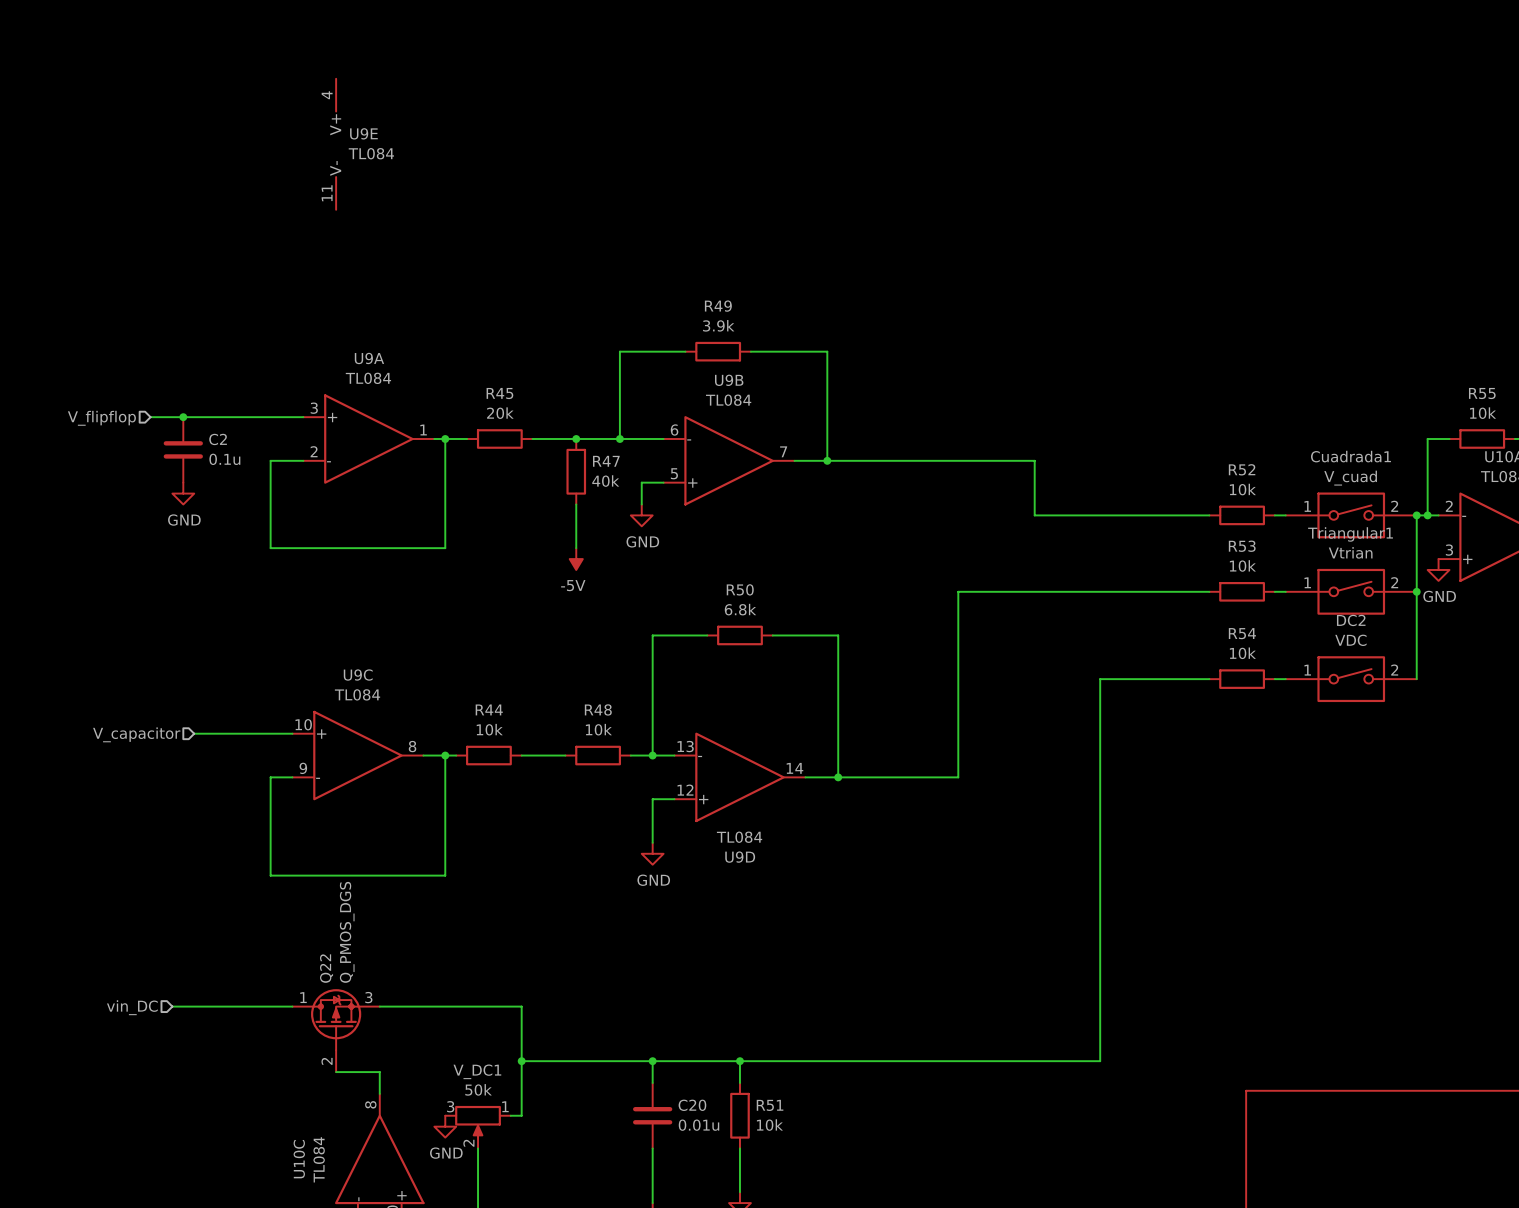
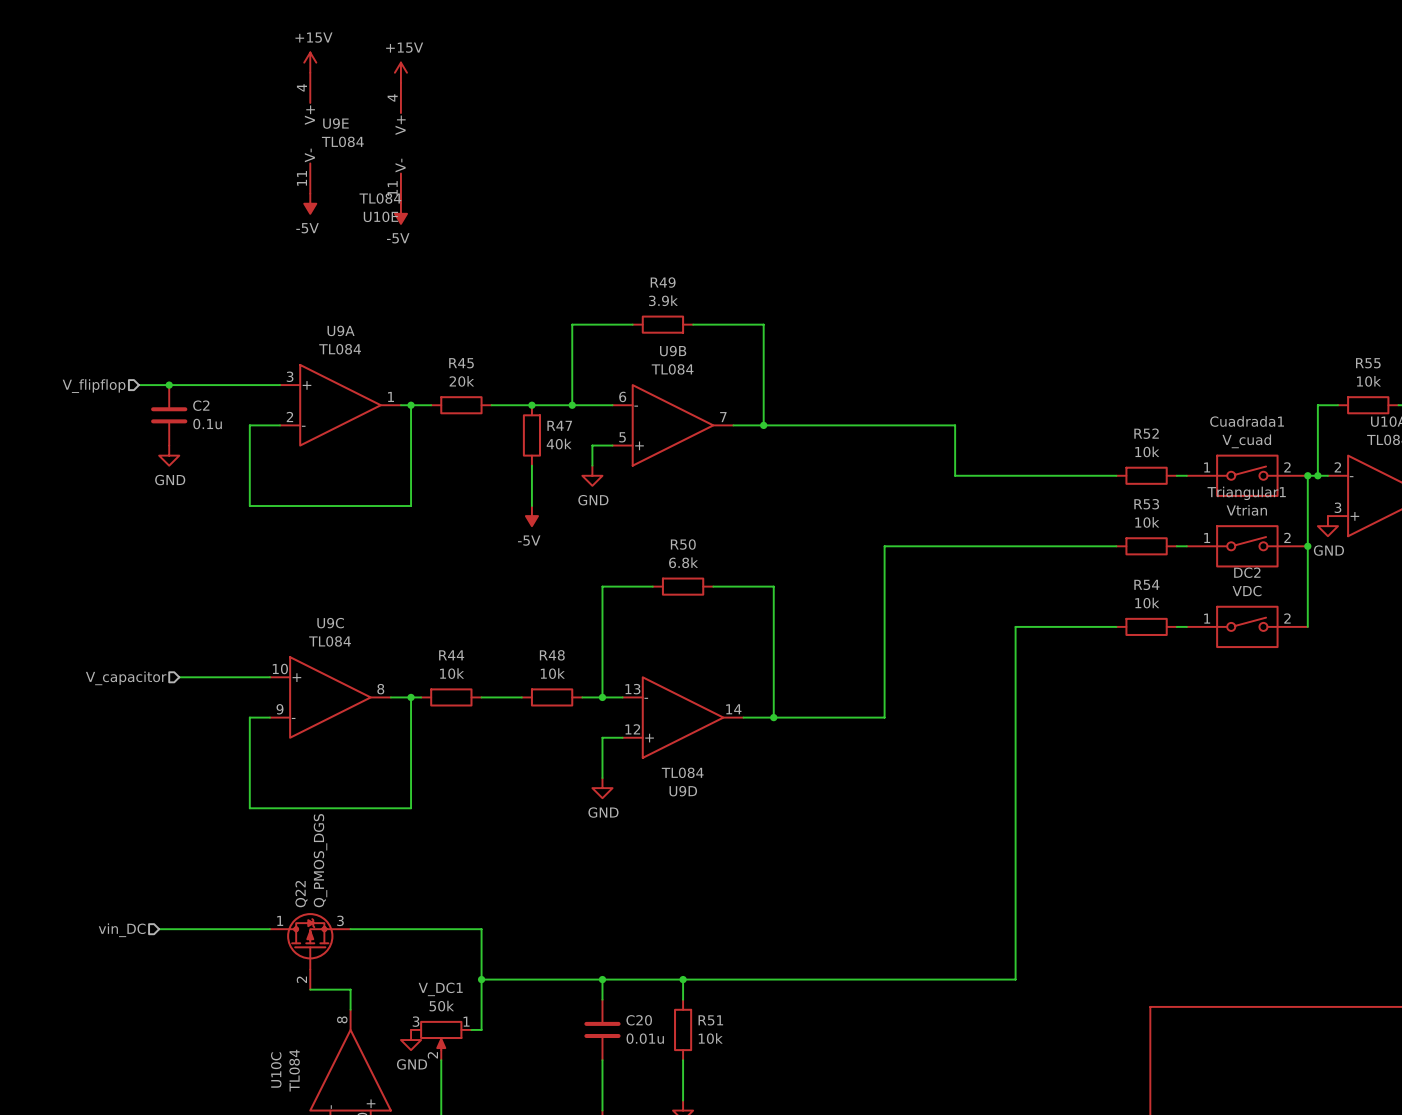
power symbol: none -> +15V (310, 62)
power symbol: none -> +15V (400, 72)
U10E: none -> TL084 (400, 143)
power symbol: none -> -5V (310, 203)
power symbol: none -> -5V (400, 213)

